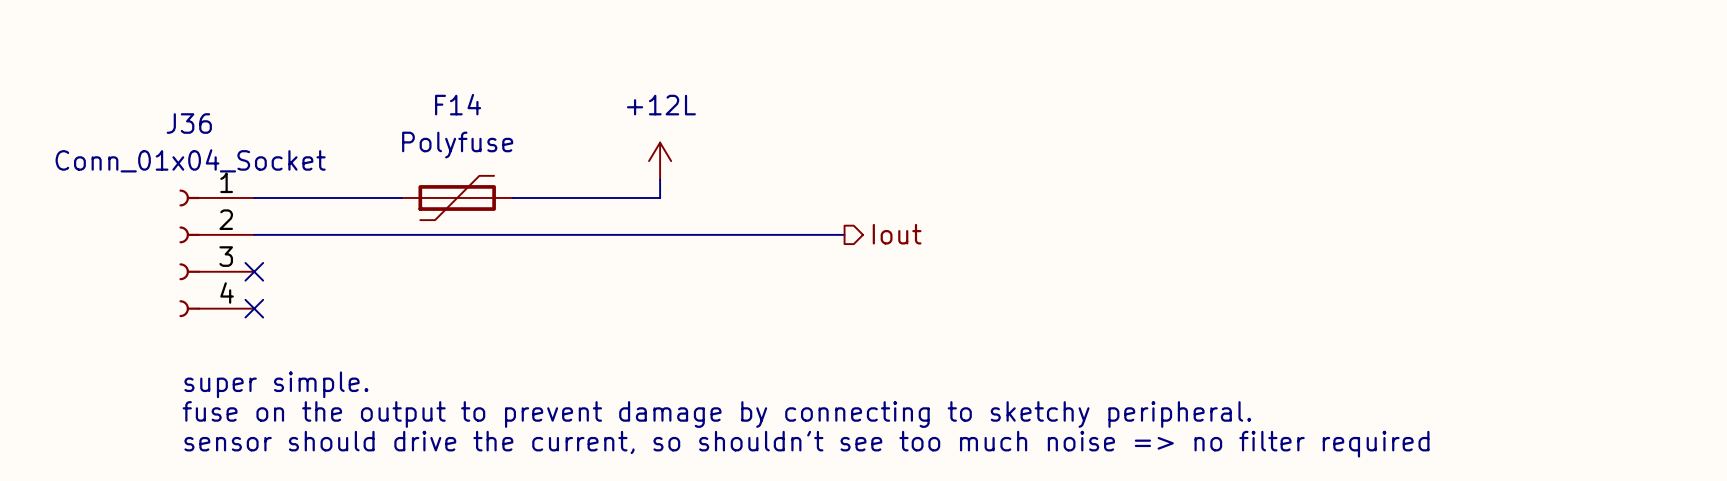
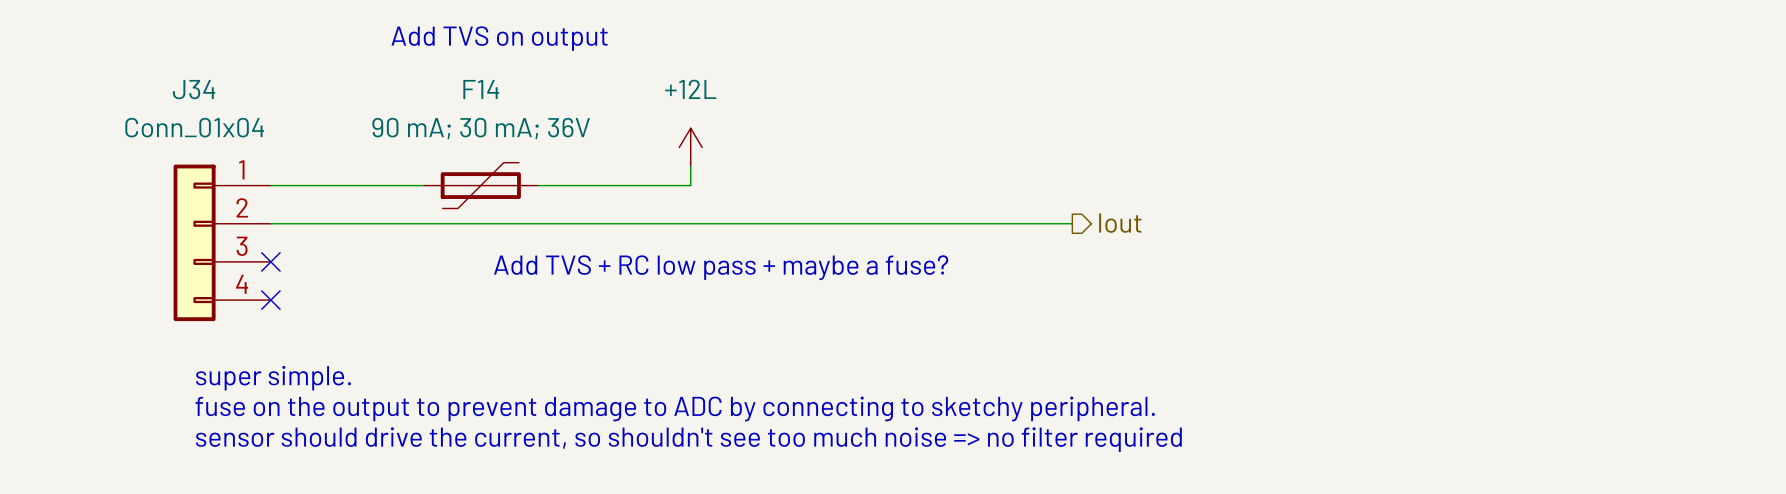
text: none -> Add TVS on output (499, 38)
F14 value: Polyfuse (457, 145) -> 90 mA; 30 mA; 36V (481, 128)
wire: none -> (881, 223) (1072, 223)
hierarchical label position: Iout (897, 234) -> Iout (1120, 223)
J34: none -> Conn_01x04 (222, 242)
J36: Conn_01x04_Socket (216, 253) -> none
text: none -> Add TVS + RC low pass + maybe a fuse? (721, 267)
text: fuse on the output to prevent damage by connecting to sketchy peripheral. (716, 414) -> fuse on the output to prevent damage to ADC by connecting to sketchy peripheral. (675, 408)

